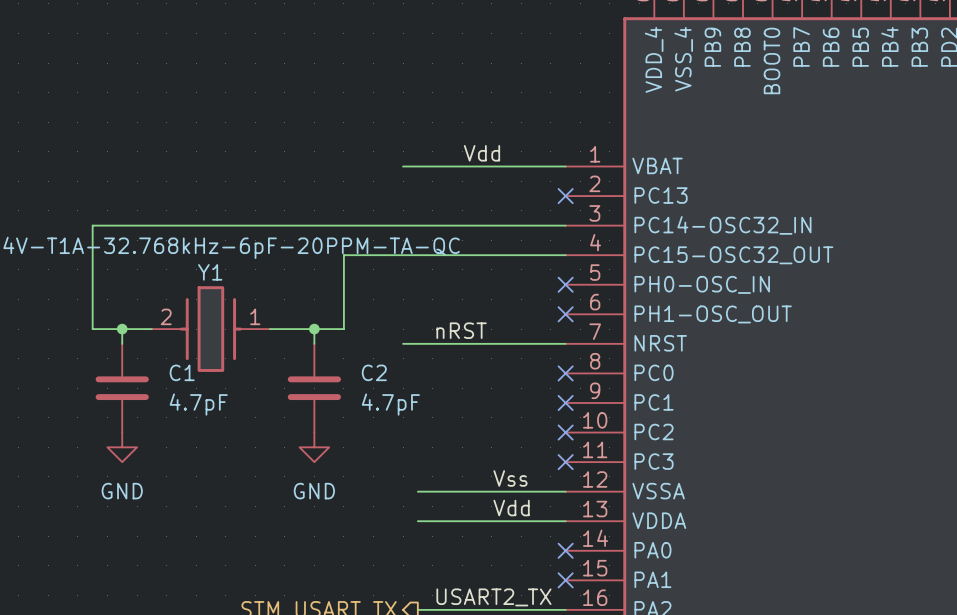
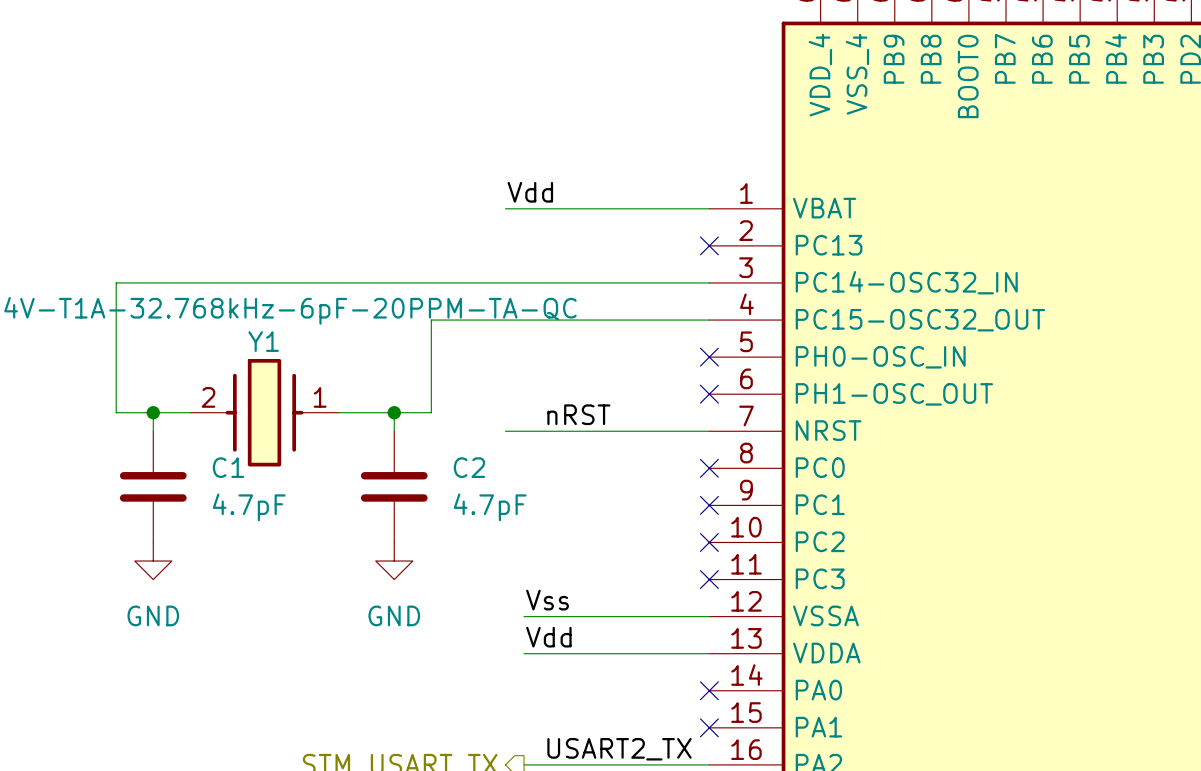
label position: Vdd (481, 153) -> Vdd (530, 192)
label position: Vss (510, 478) -> Vss (547, 600)
label position: Vdd (511, 508) -> Vdd (548, 637)

